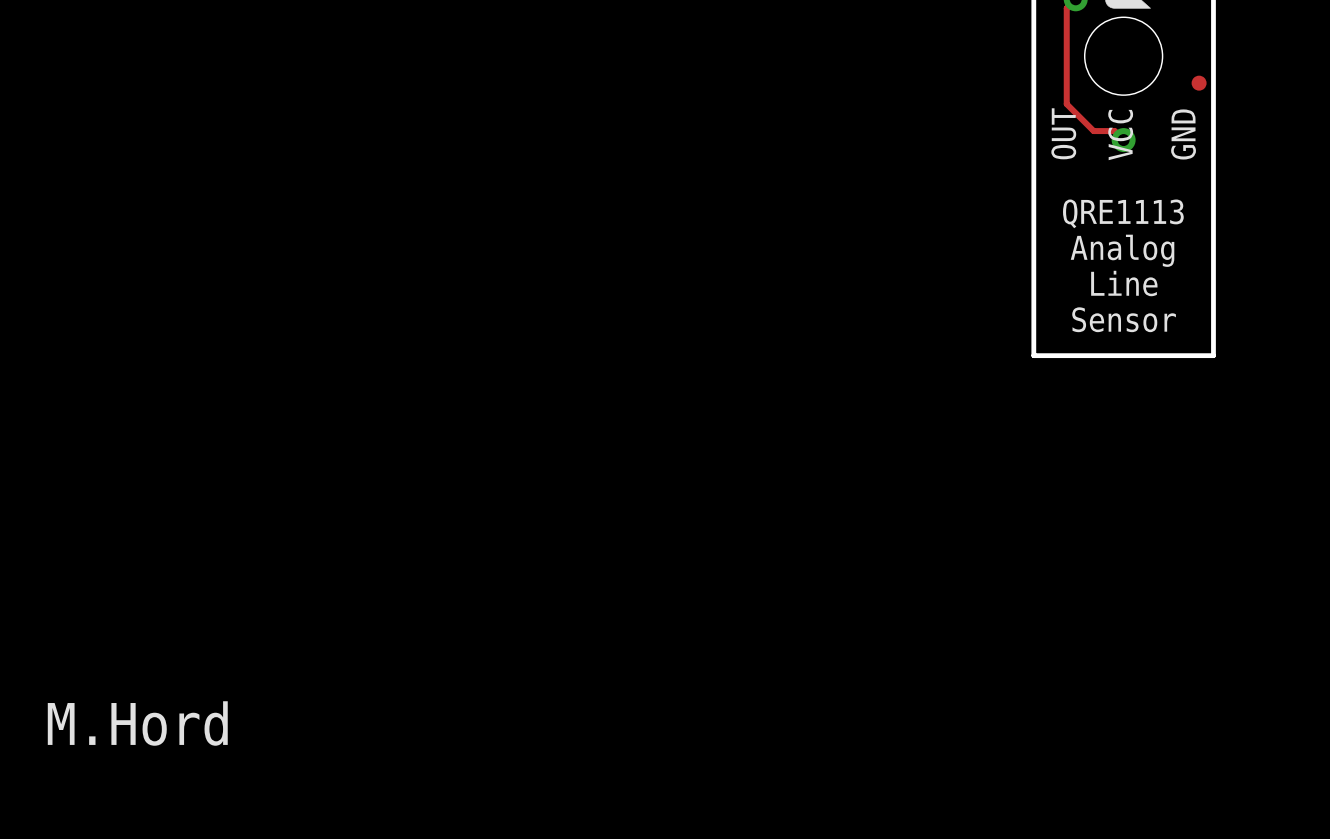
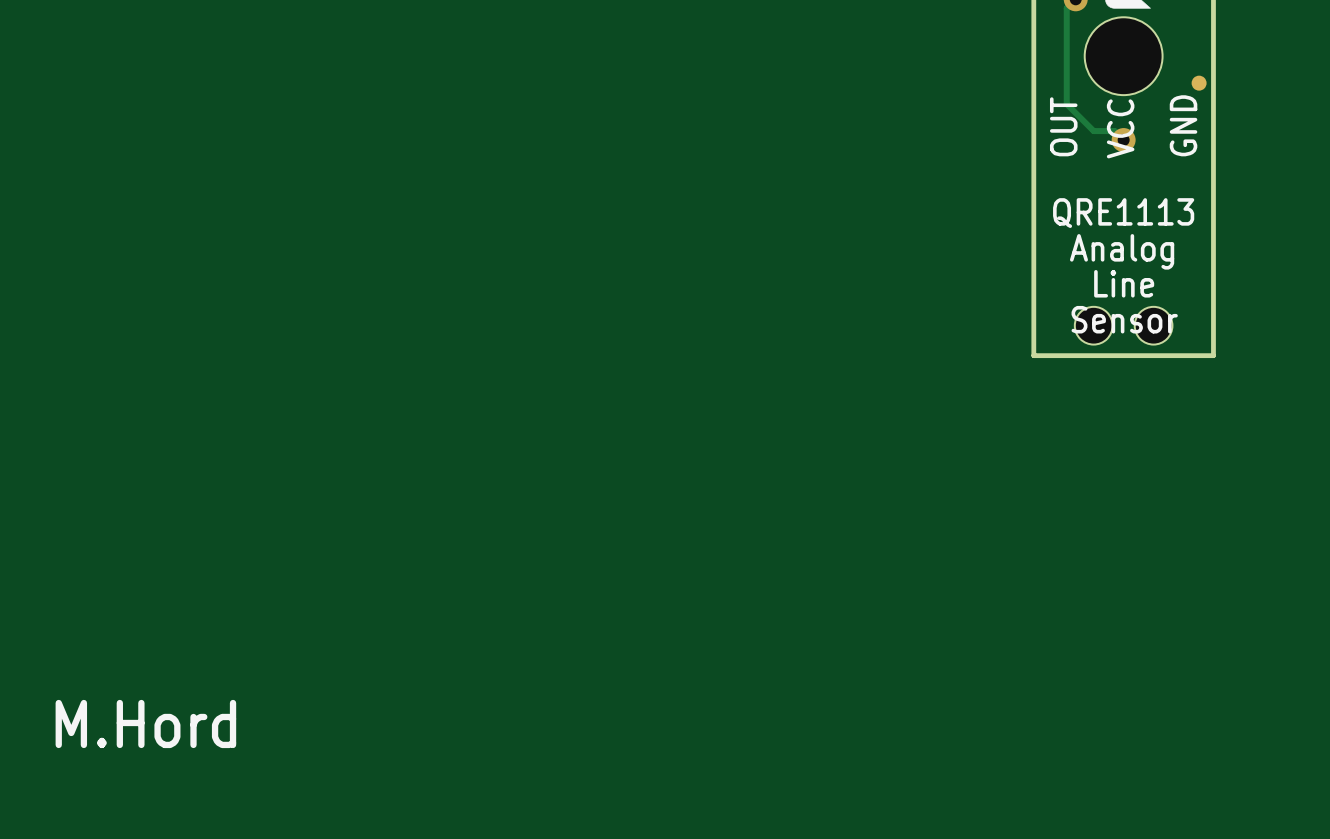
part: none -> (1123, 325)

